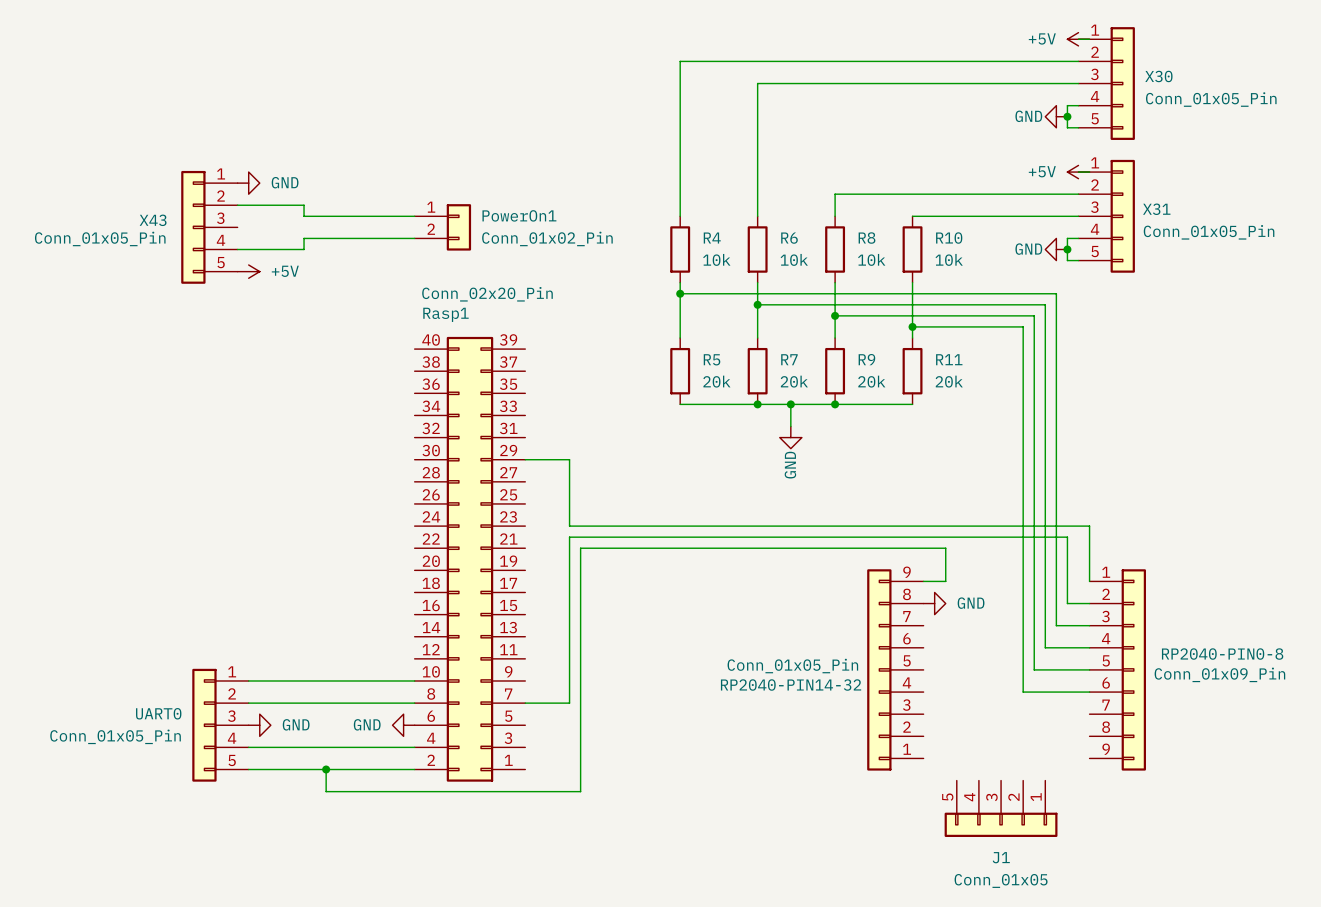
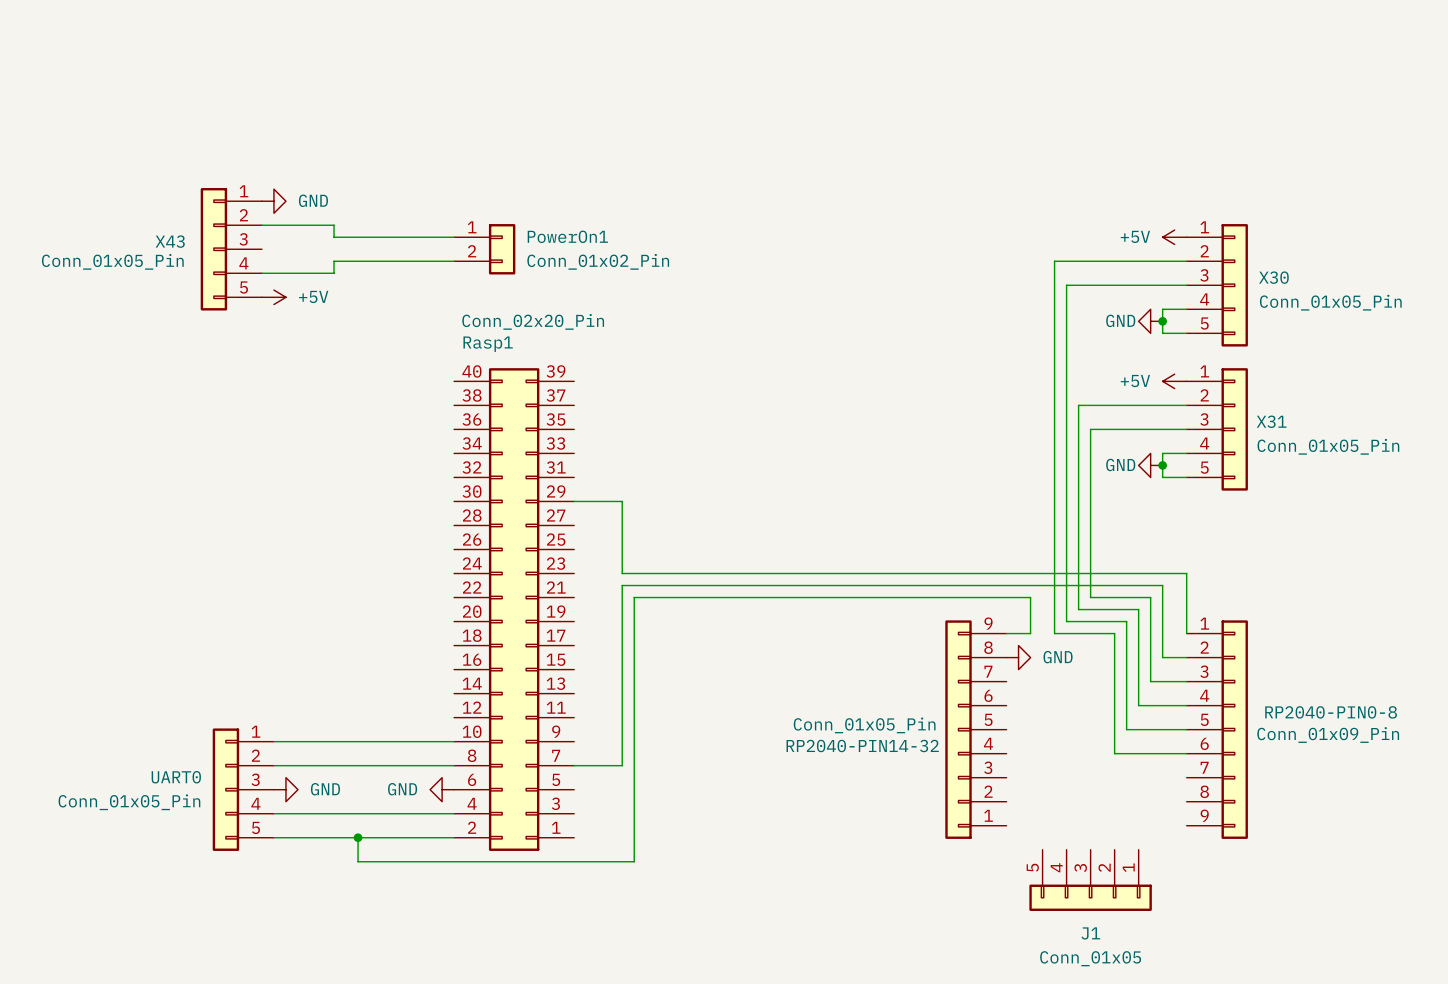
wire: (1078, 39) (1089, 39) -> none
power symbol: +5V (1078, 39) -> none
wire: (1078, 61) (680, 61) (680, 216) -> none
wire: (1078, 83) (757, 83) (757, 216) -> none
X30 position: (1106, 83) -> (1217, 285)
wire: (1078, 105) (1067, 105) (1067, 127) (1078, 127) -> none
power symbol: GND (1056, 116) -> none
junction: (1067, 116) -> none
power symbol position: +5V (1078, 172) -> +5V (1174, 237)
wire: (1078, 194) (835, 194) (835, 216) -> none
wire: (912, 216) (1078, 216) -> none
X31 position: (1106, 216) -> (1217, 429)
wire: (1067, 238) (1067, 260) -> none
R4: 10k (680, 249) -> none
R6: 10k (757, 249) -> none
R8: 10k (835, 249) -> none
R10: 10k (912, 249) -> none
power symbol position: GND (1056, 249) -> GND (1150, 321)
junction position: (1067, 249) -> (1162, 321)
wire: (680, 282) (680, 338) -> none
wire: (757, 282) (757, 338) -> none
wire: (835, 282) (835, 338) -> none
wire: (912, 282) (912, 338) -> none
wire: none -> (1186, 309) (1162, 309) (1162, 333) (1186, 333)
wire: (680, 293) (1056, 293) (1056, 548) -> (1186, 429) (1090, 429) (1090, 597) (1150, 597)
junction: (680, 293) -> none
wire: (757, 304) (1045, 304) (1045, 559) -> (1186, 405) (1078, 405) (1078, 609) (1138, 609)
junction: (757, 304) -> none
wire: (835, 315) (1034, 315) (1034, 570) -> (1162, 285) (1066, 285) (1066, 621) (1126, 621)
junction: (835, 315) -> none
wire: (912, 326) (1023, 326) (1023, 581) -> (1162, 261) (1054, 261) (1054, 633) (1114, 633)
junction: (912, 326) -> none
power symbol: none -> +5V (1174, 381)
R5: 20k (680, 371) -> none
R7: 20k (757, 371) -> none
R9: 20k (835, 371) -> none
R11: 20k (912, 371) -> none
wire: (680, 404) (912, 404) -> none
junction: (757, 404) -> none
wire: (790, 404) (790, 426) -> none
junction: (790, 404) -> none
junction: (835, 404) -> none
wire: none -> (1186, 453) (1162, 453) (1162, 477) (1186, 477)
power symbol: none -> GND (1150, 465)
junction: none -> (1162, 465)
power symbol: GND (790, 437) -> none

